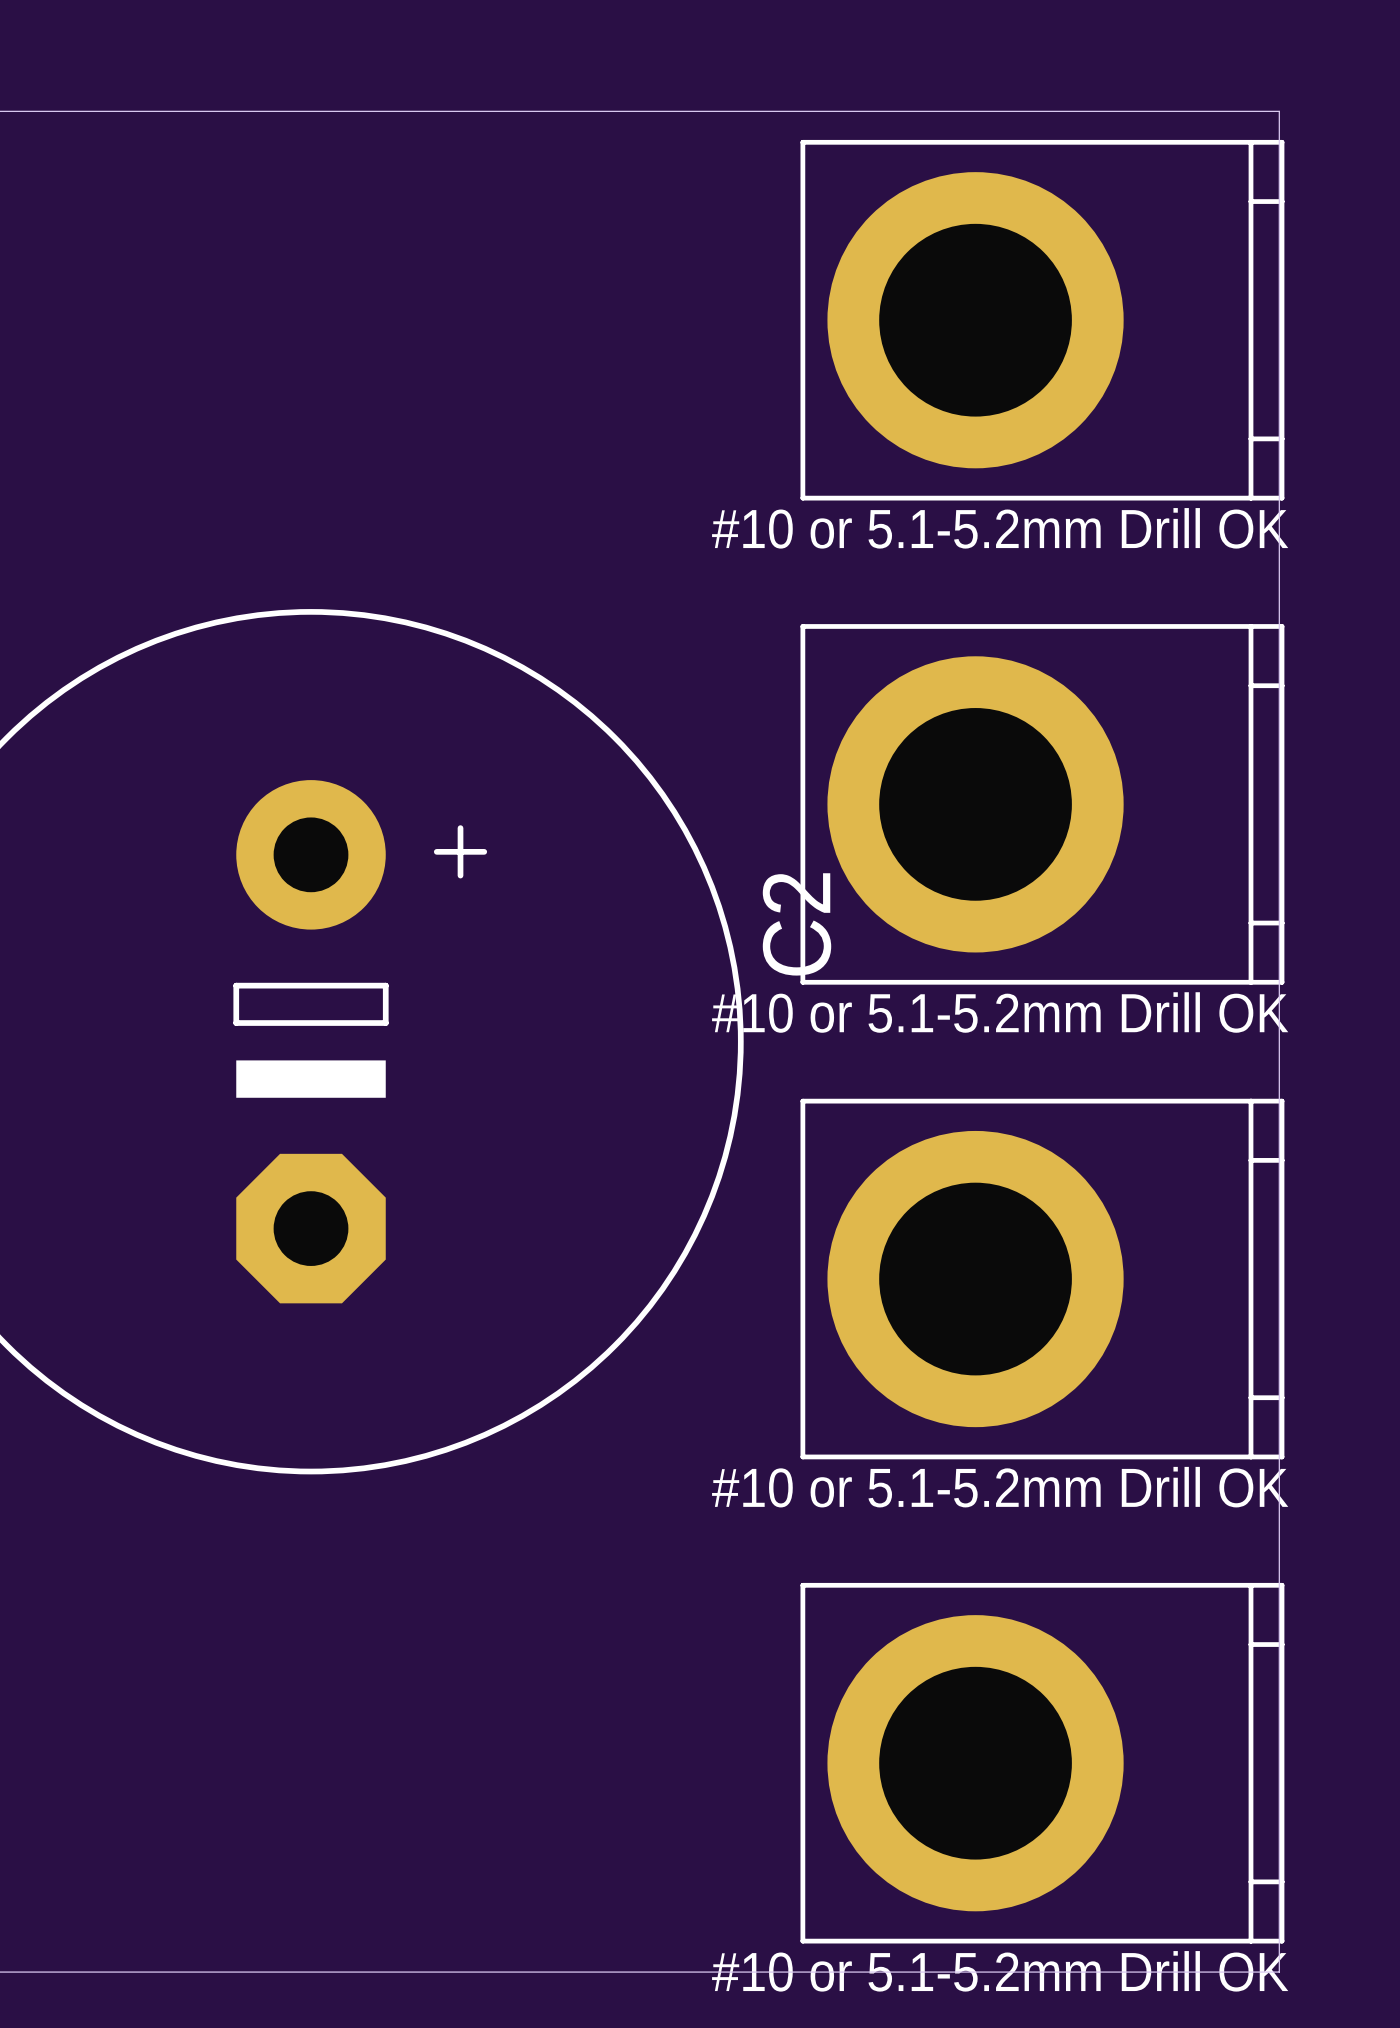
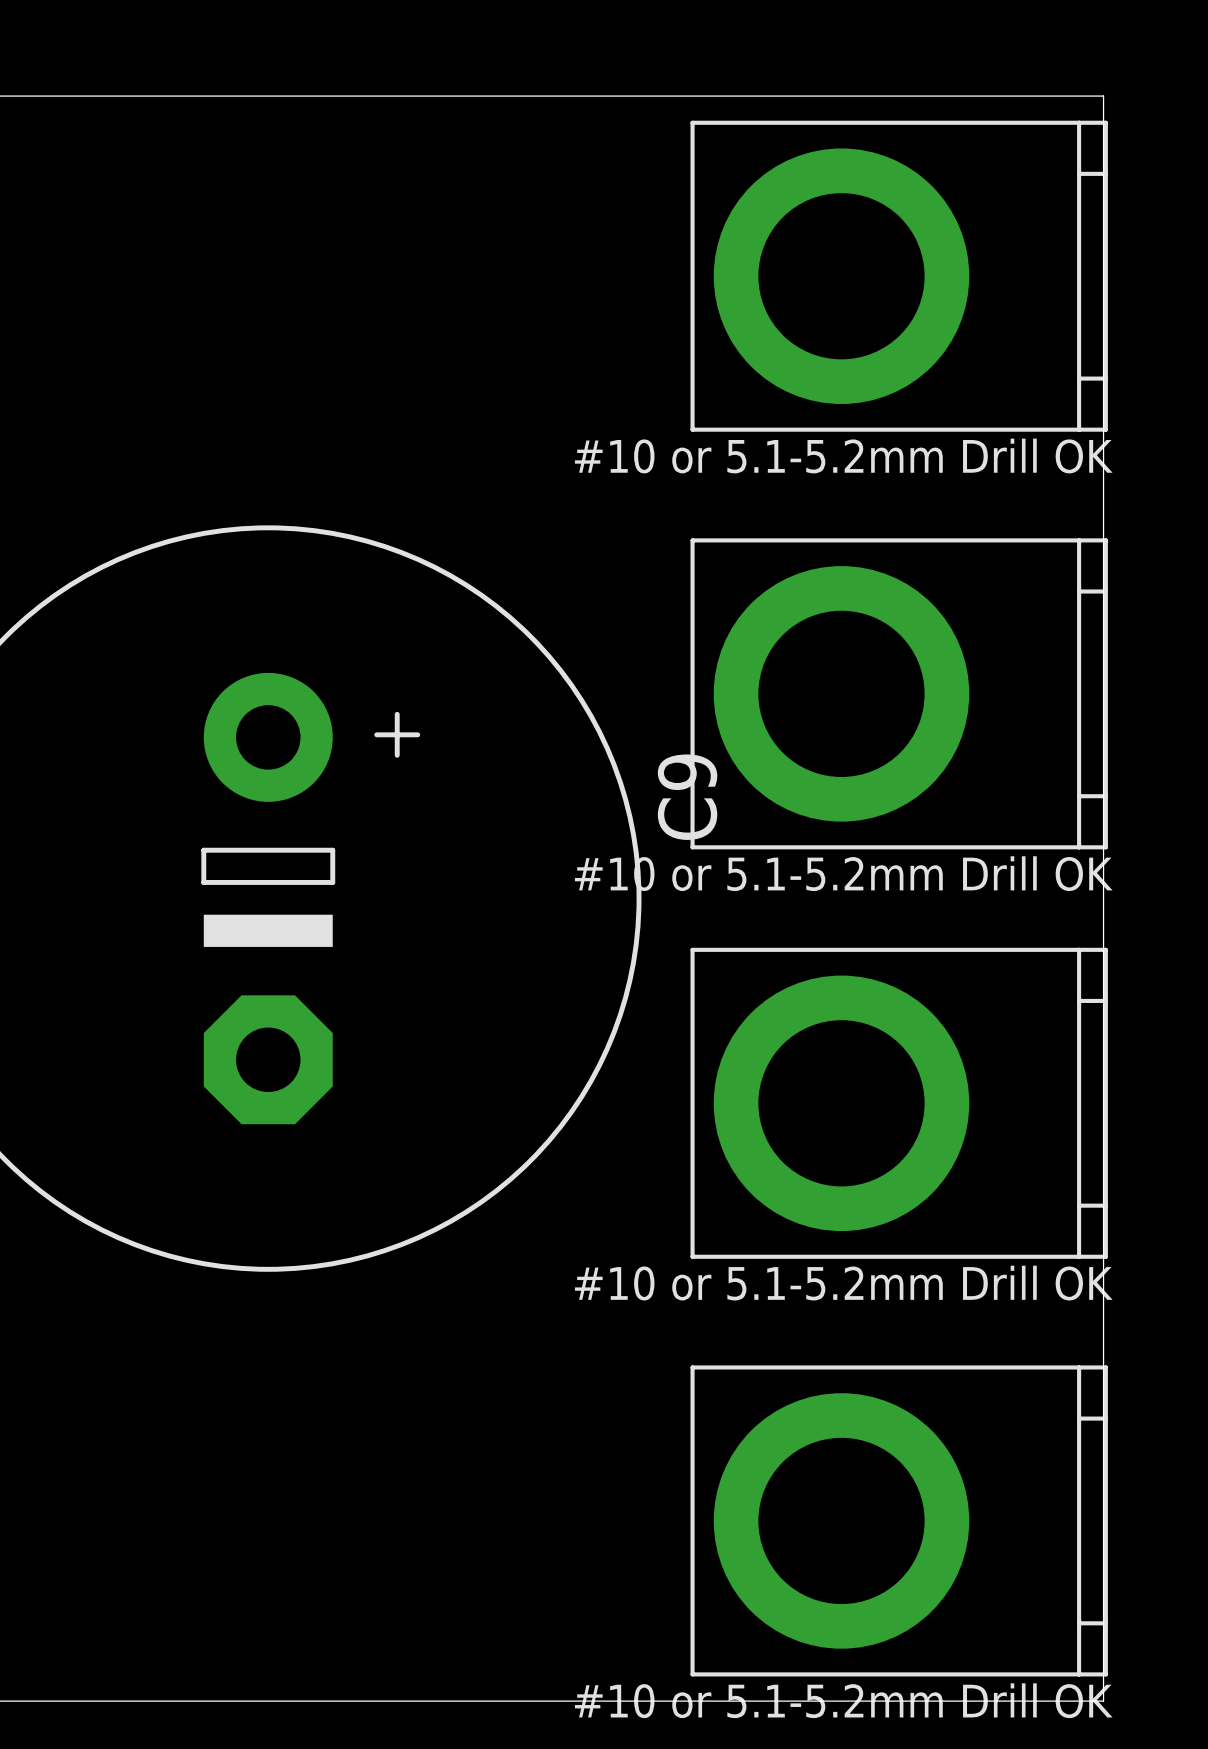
C2 name: C2 (797, 924) -> C9 (687, 797)

